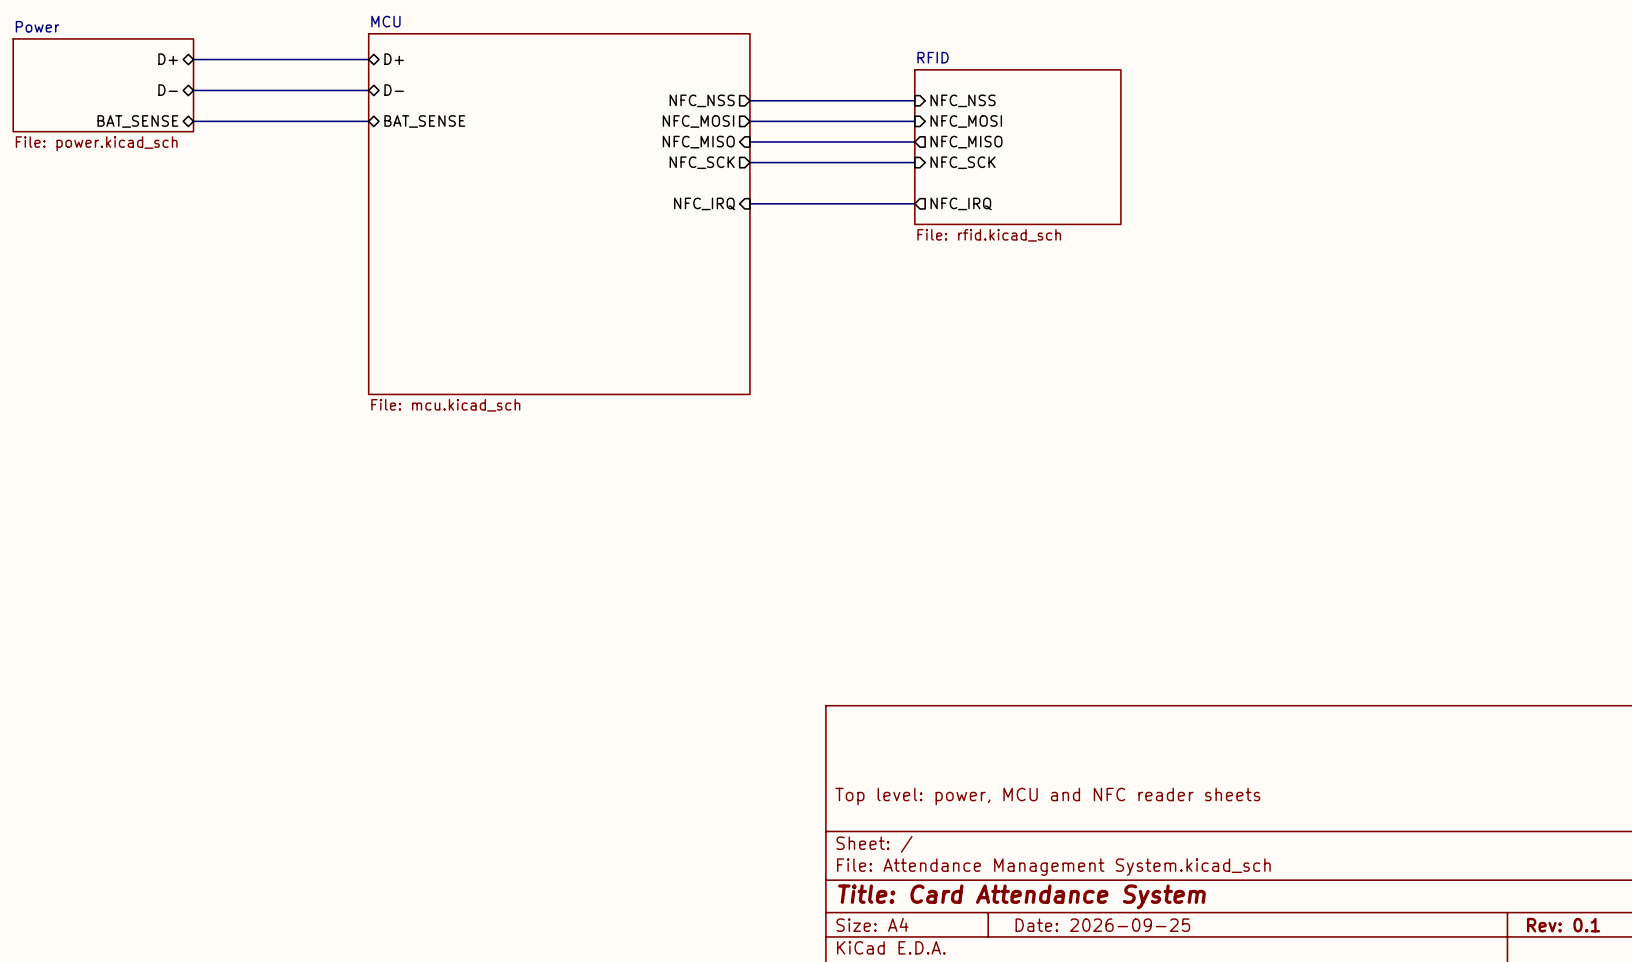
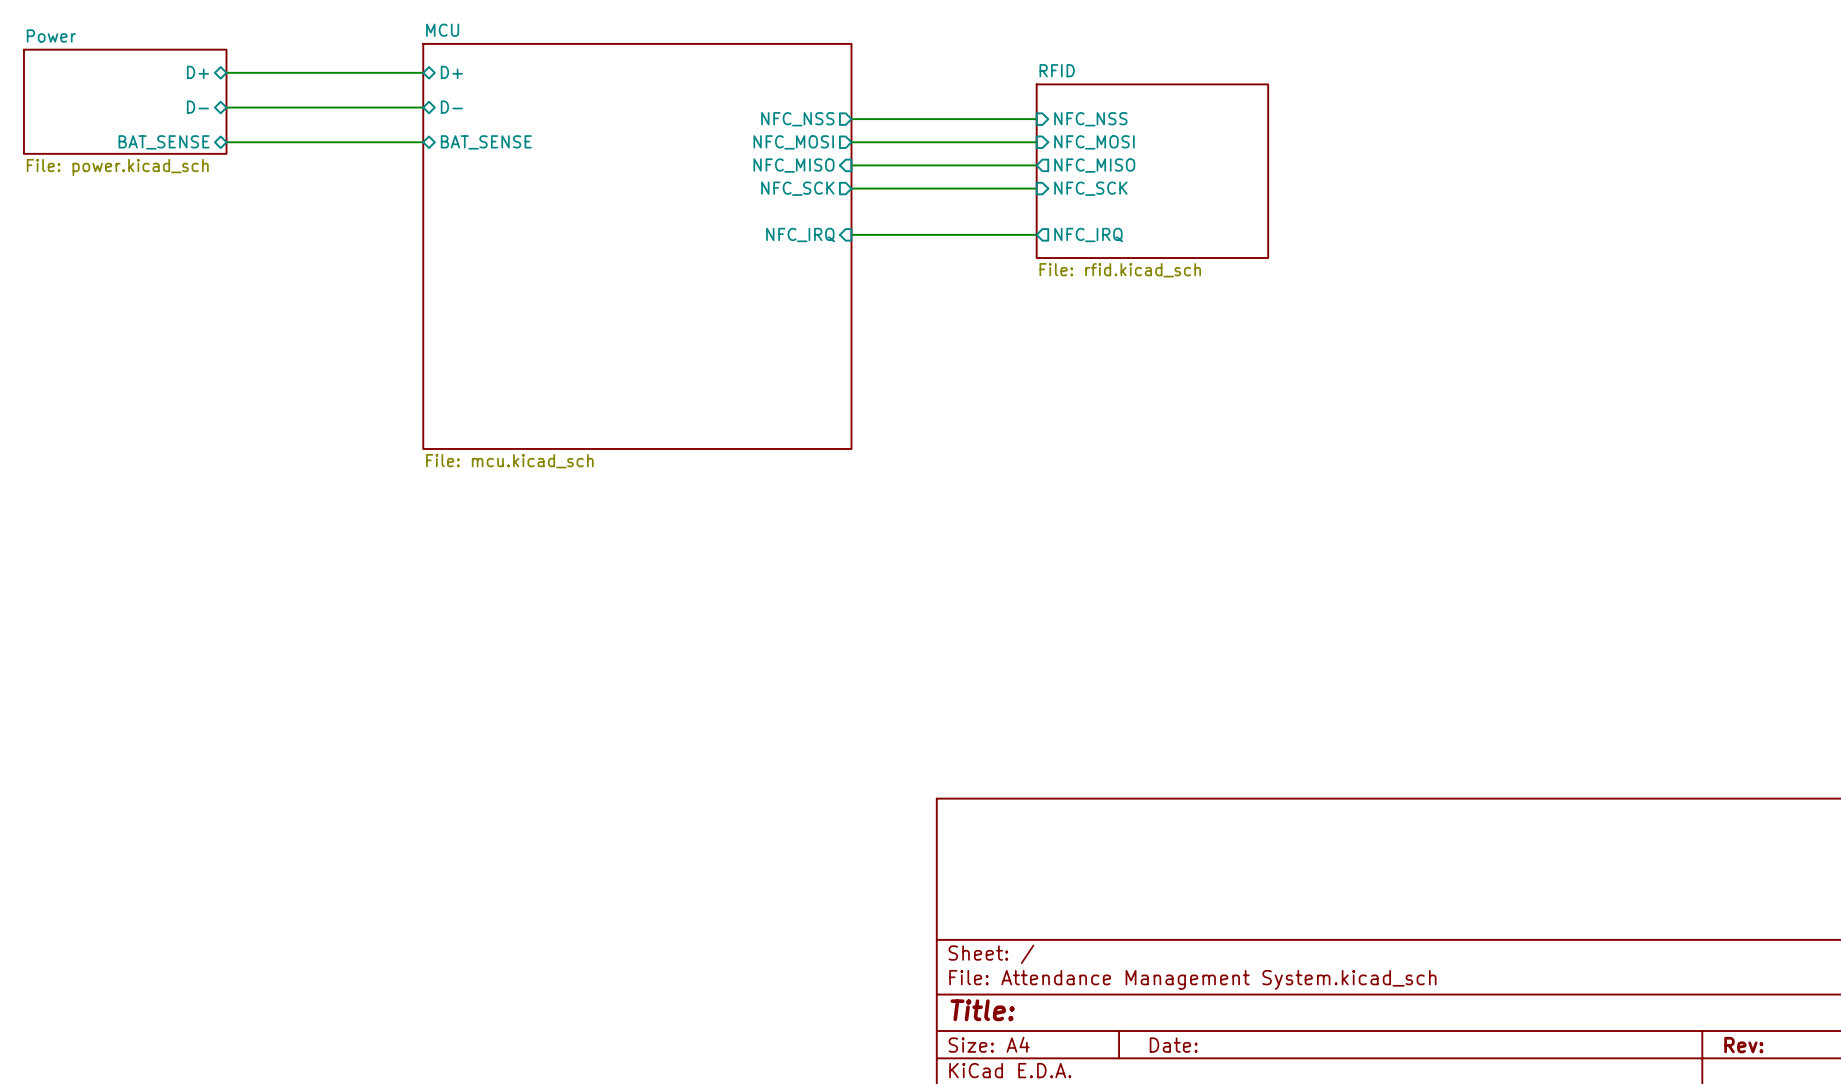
title block: Top level: power, MCU and NFC reader sheets (1047, 796) -> none
title block: Title: Card Attendance System (1021, 896) -> Title: (982, 1010)
title block: Date: 2026-09-25 (1102, 925) -> Date: (1173, 1045)
title block: Rev: 0.1 (1563, 925) -> Rev: (1743, 1045)

